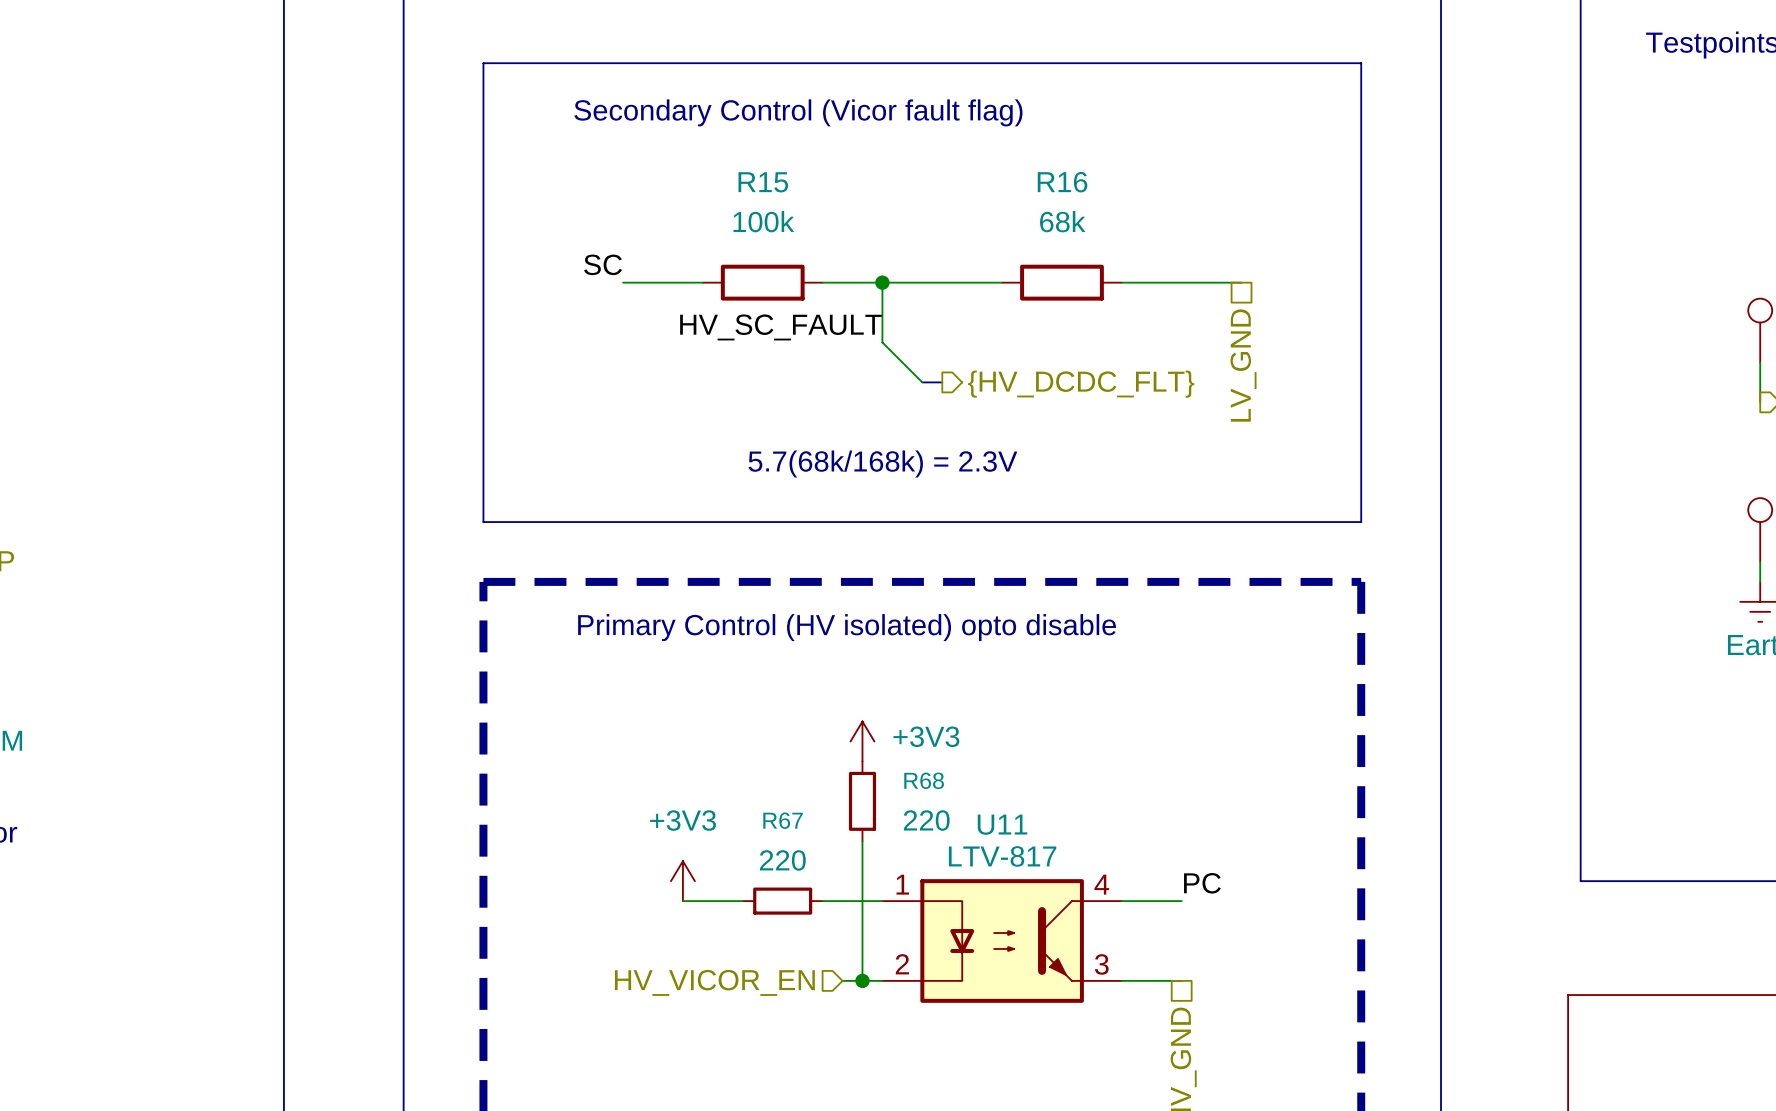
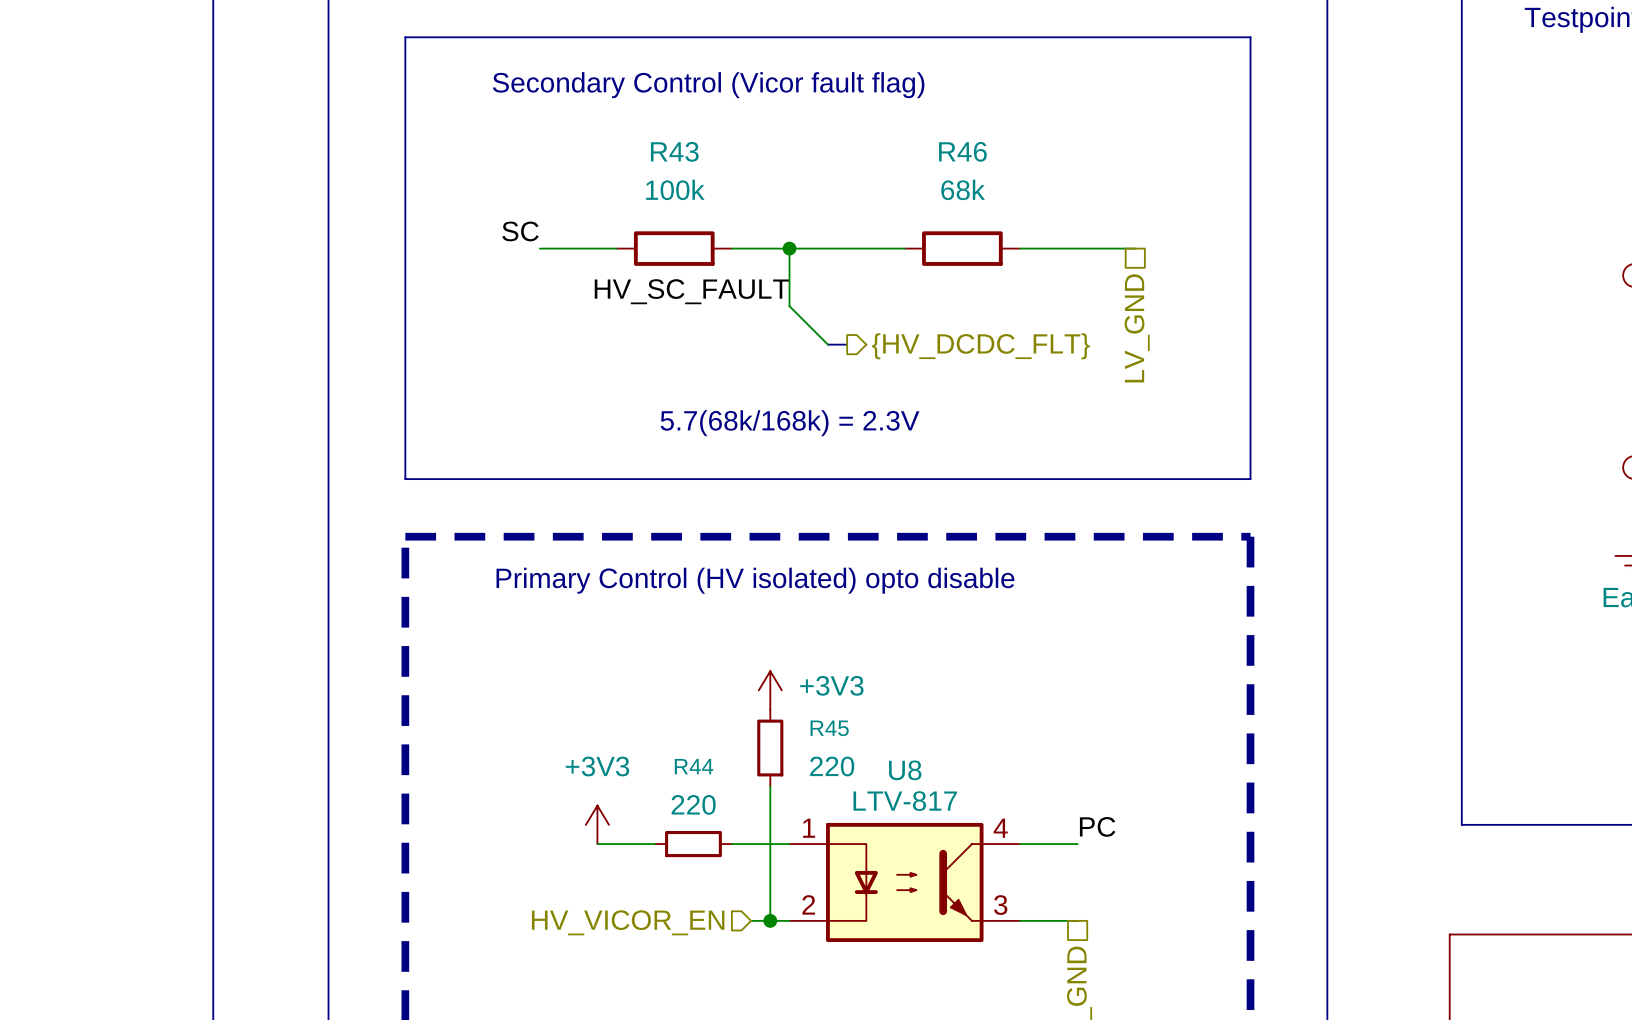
R15 name: R15 (763, 182) -> R43 (674, 151)
R16 name: R16 (1062, 182) -> R46 (962, 151)
R68 name: R68 (924, 780) -> R45 (829, 728)
R67 name: R67 (783, 820) -> R44 (694, 766)
U11 name: U11 (1002, 824) -> U8 (905, 770)

